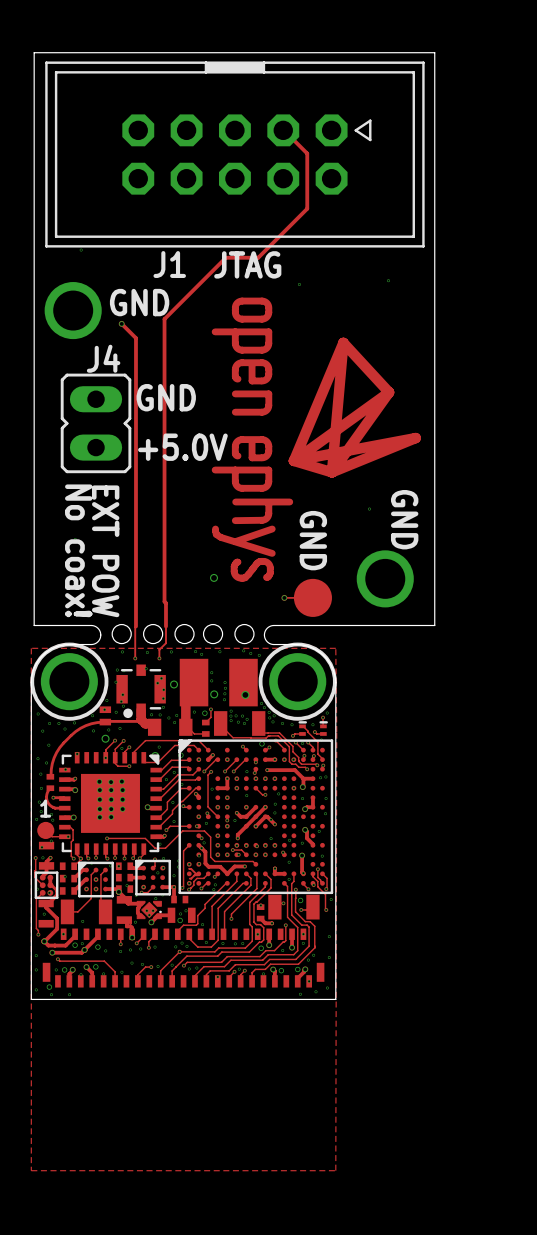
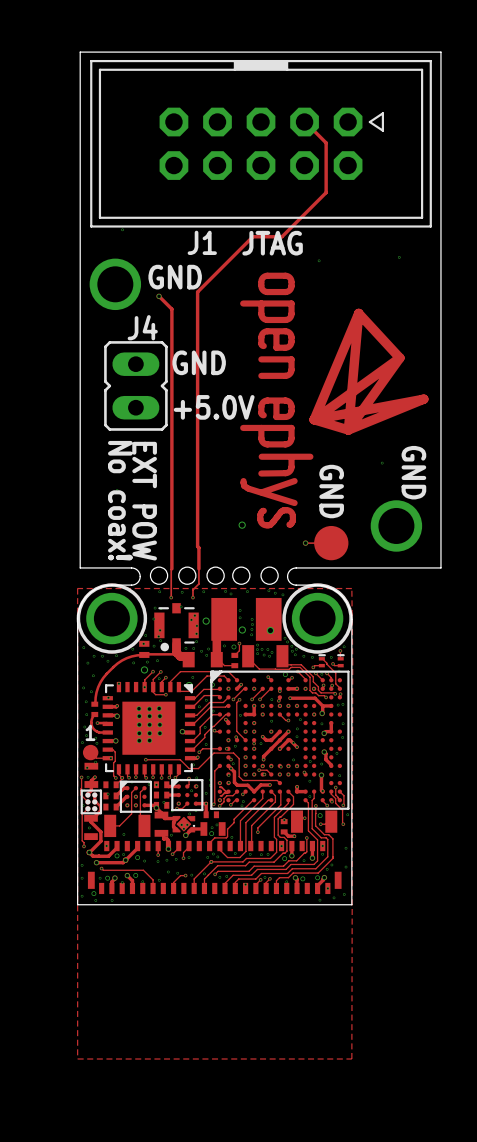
part footprint: [34, 871, 59, 900] -> [80, 789, 103, 815]

